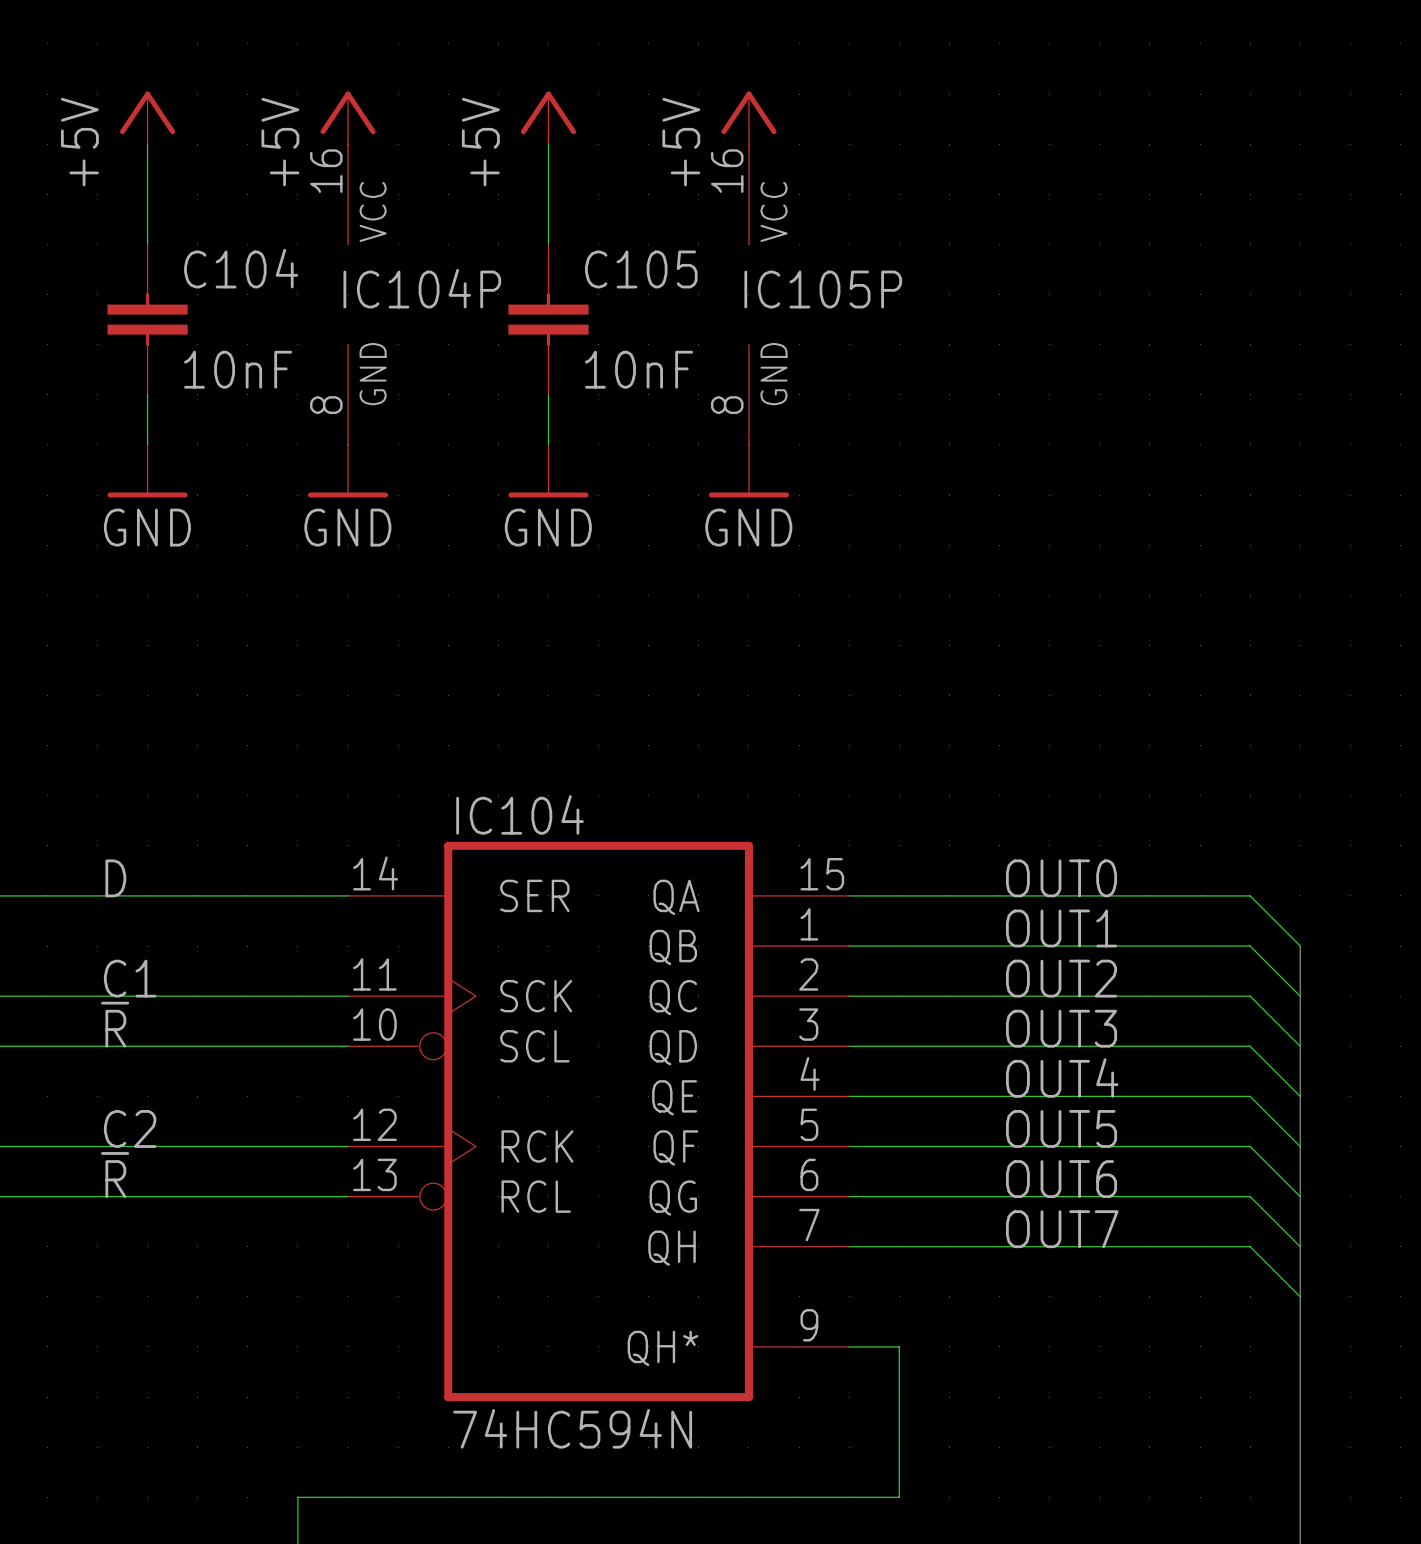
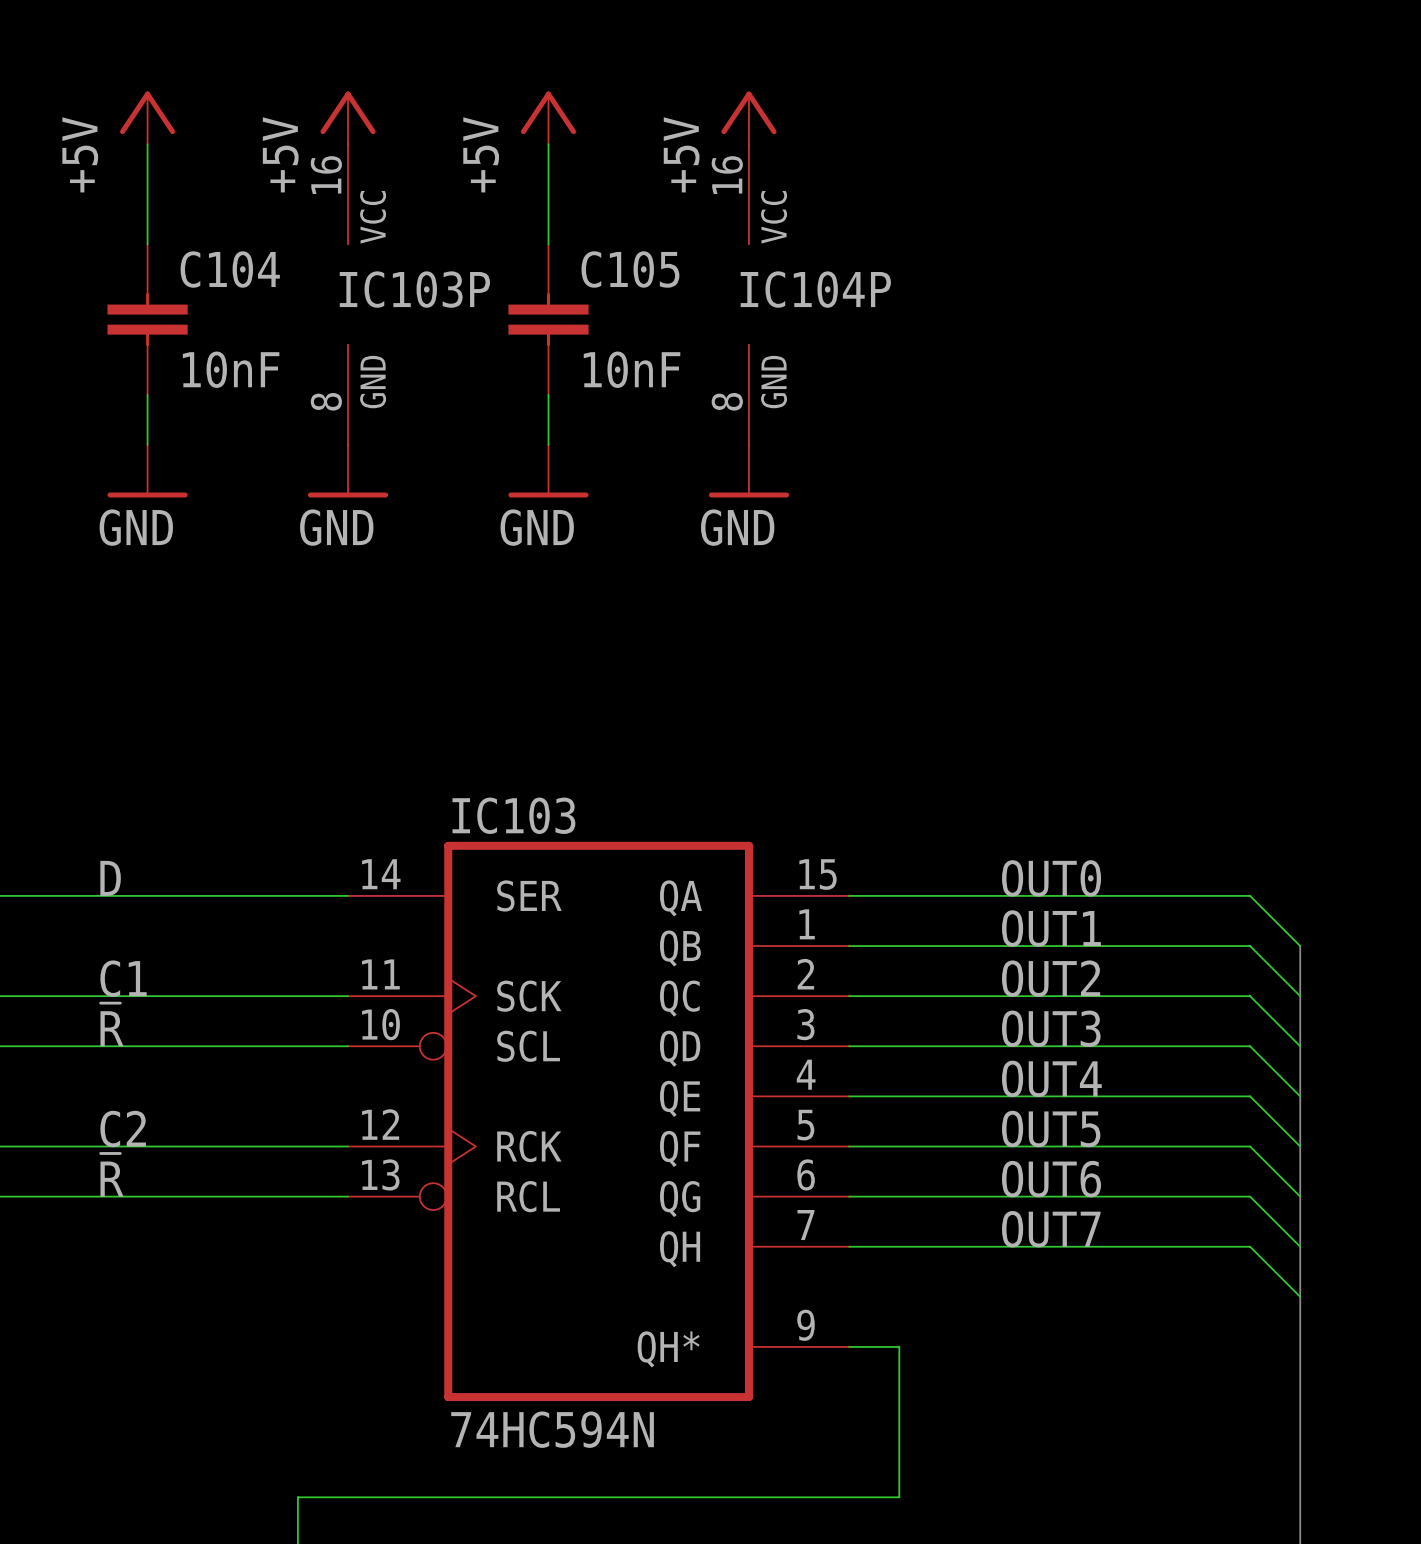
IC104P name: IC104P (422, 288) -> IC103P (414, 289)
IC105P name: IC105P (823, 289) -> IC104P (815, 289)
IC104 name: IC104 (520, 814) -> IC103 (513, 815)

